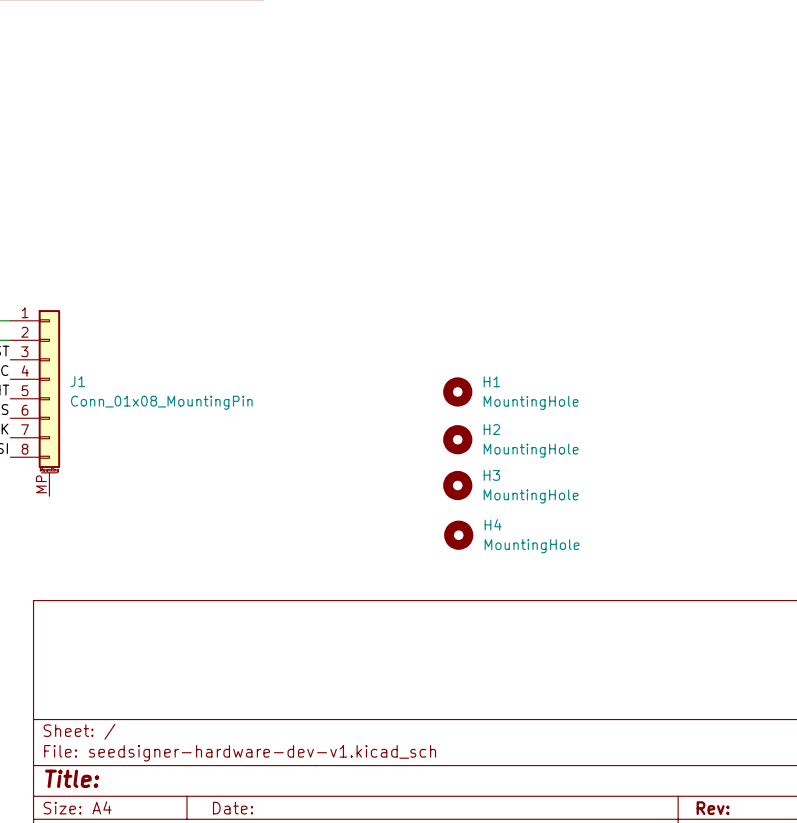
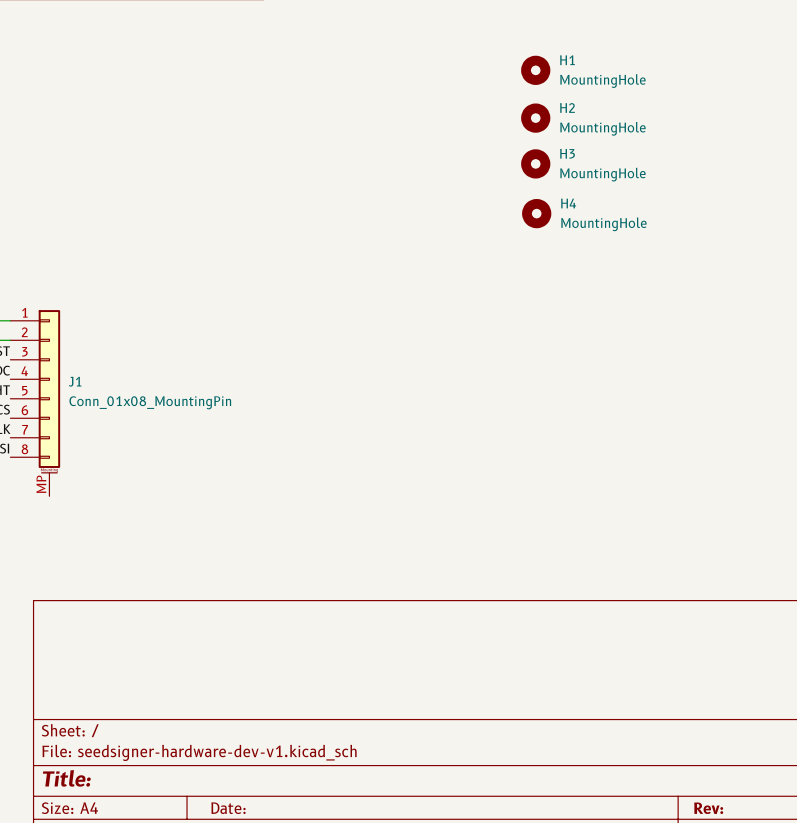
H1 position: (457, 391) -> (535, 70)
H2 position: (457, 439) -> (535, 118)
H3 position: (457, 485) -> (535, 163)
H4 position: (458, 535) -> (536, 213)

